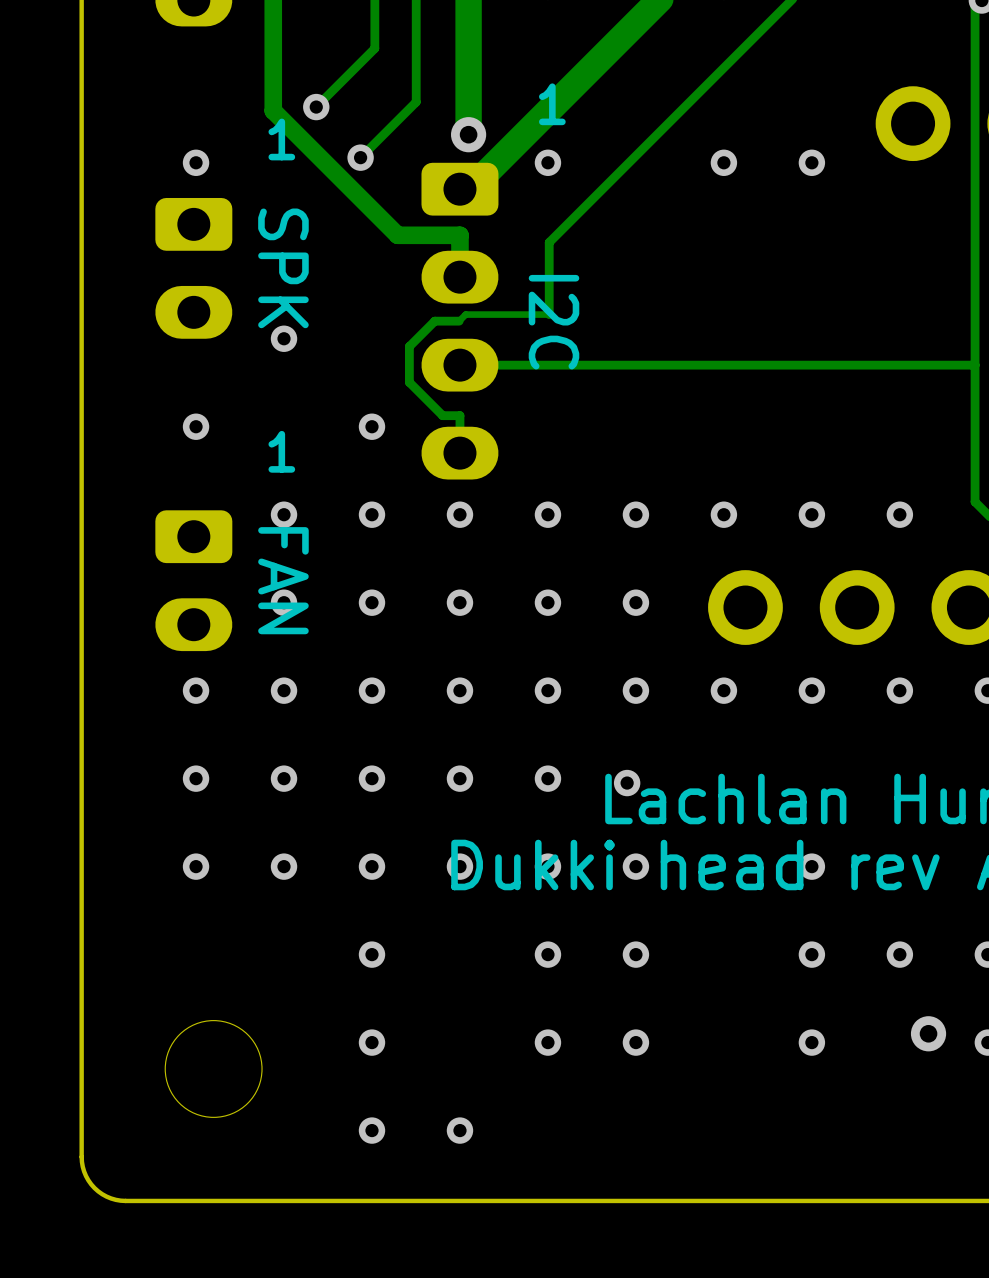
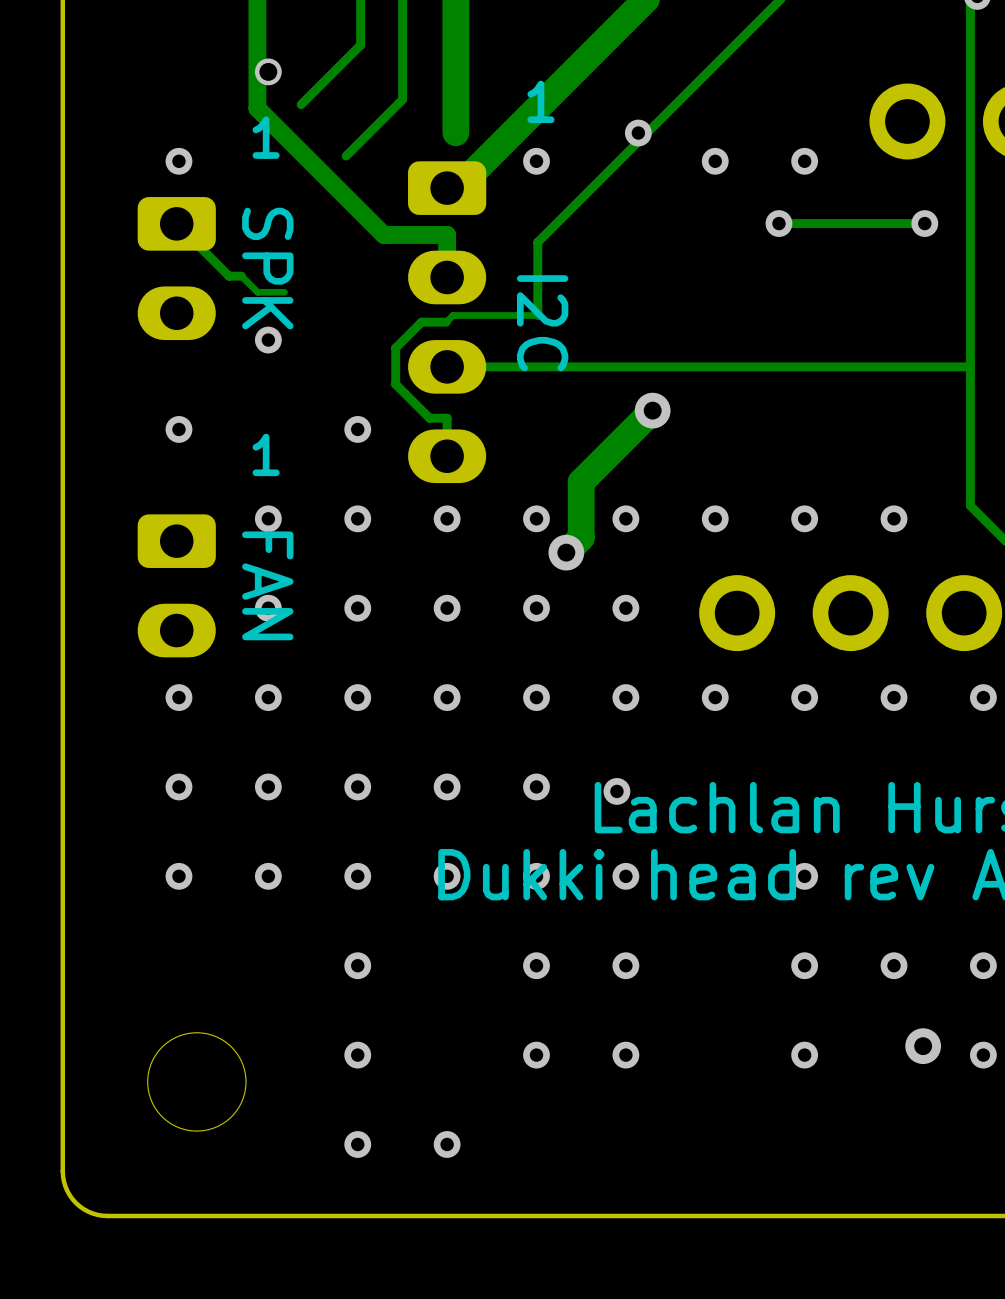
via: none -> (268, 71)
via: (316, 107) -> none
via: (468, 134) -> none
via: none -> (638, 133)
via: (360, 157) -> none
track: none -> (176, 223) (229, 276) (241, 276) (257, 292) (284, 292)
via: none -> (778, 223)
track: none -> (924, 223) (778, 223)
via: none -> (924, 223)
track: none -> (652, 410) (581, 482) (581, 537) (566, 552)
via: none -> (652, 410)
via: none -> (566, 552)

